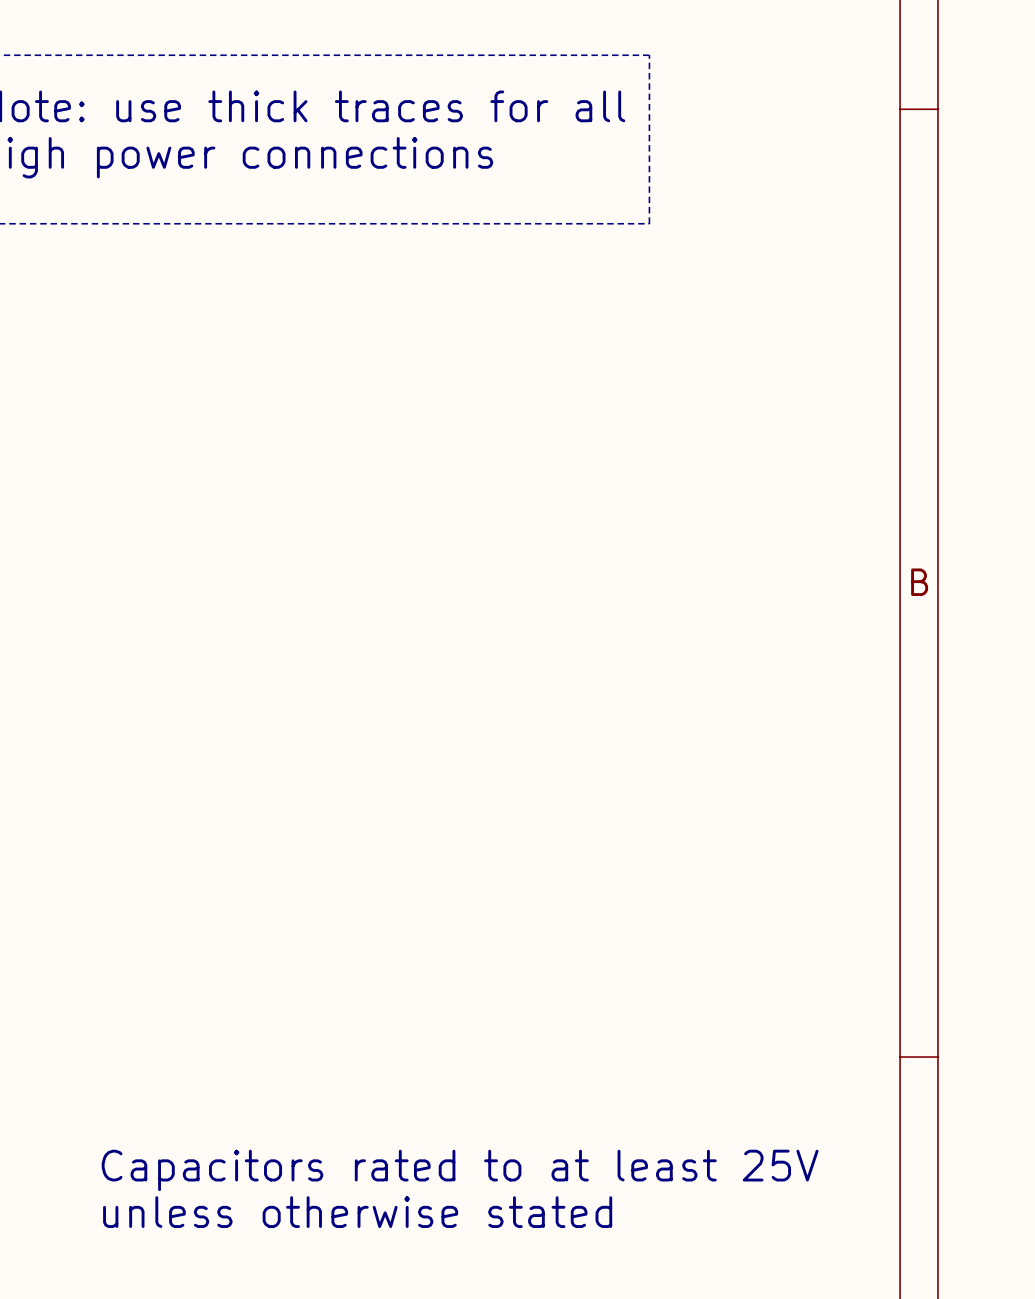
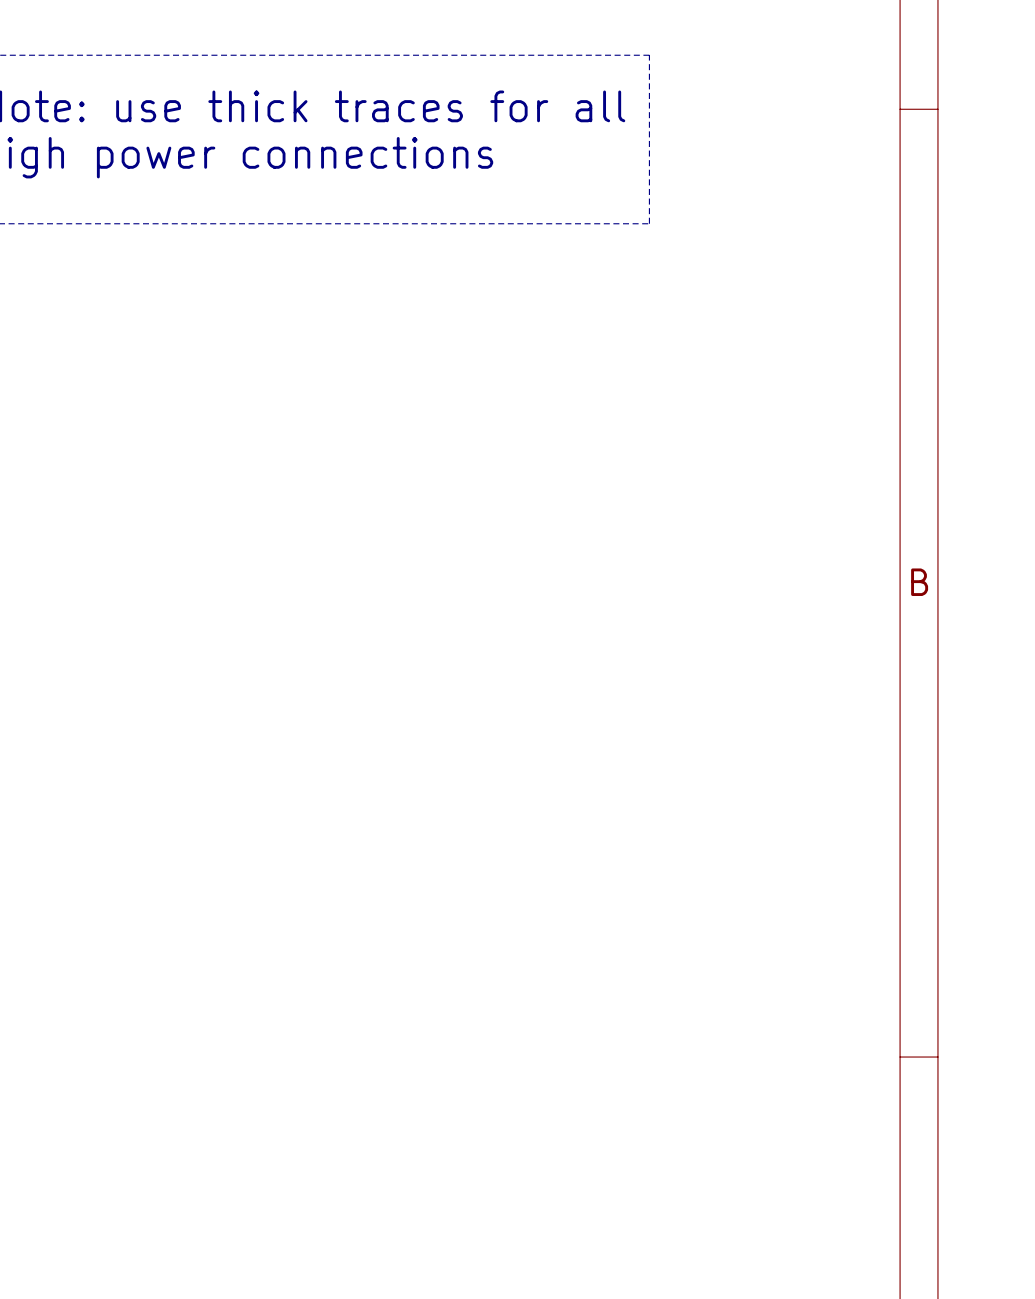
text: Capacitors rated to at least 25V (460, 1170) -> none
text: unless otherwise stated (357, 1212) -> none

